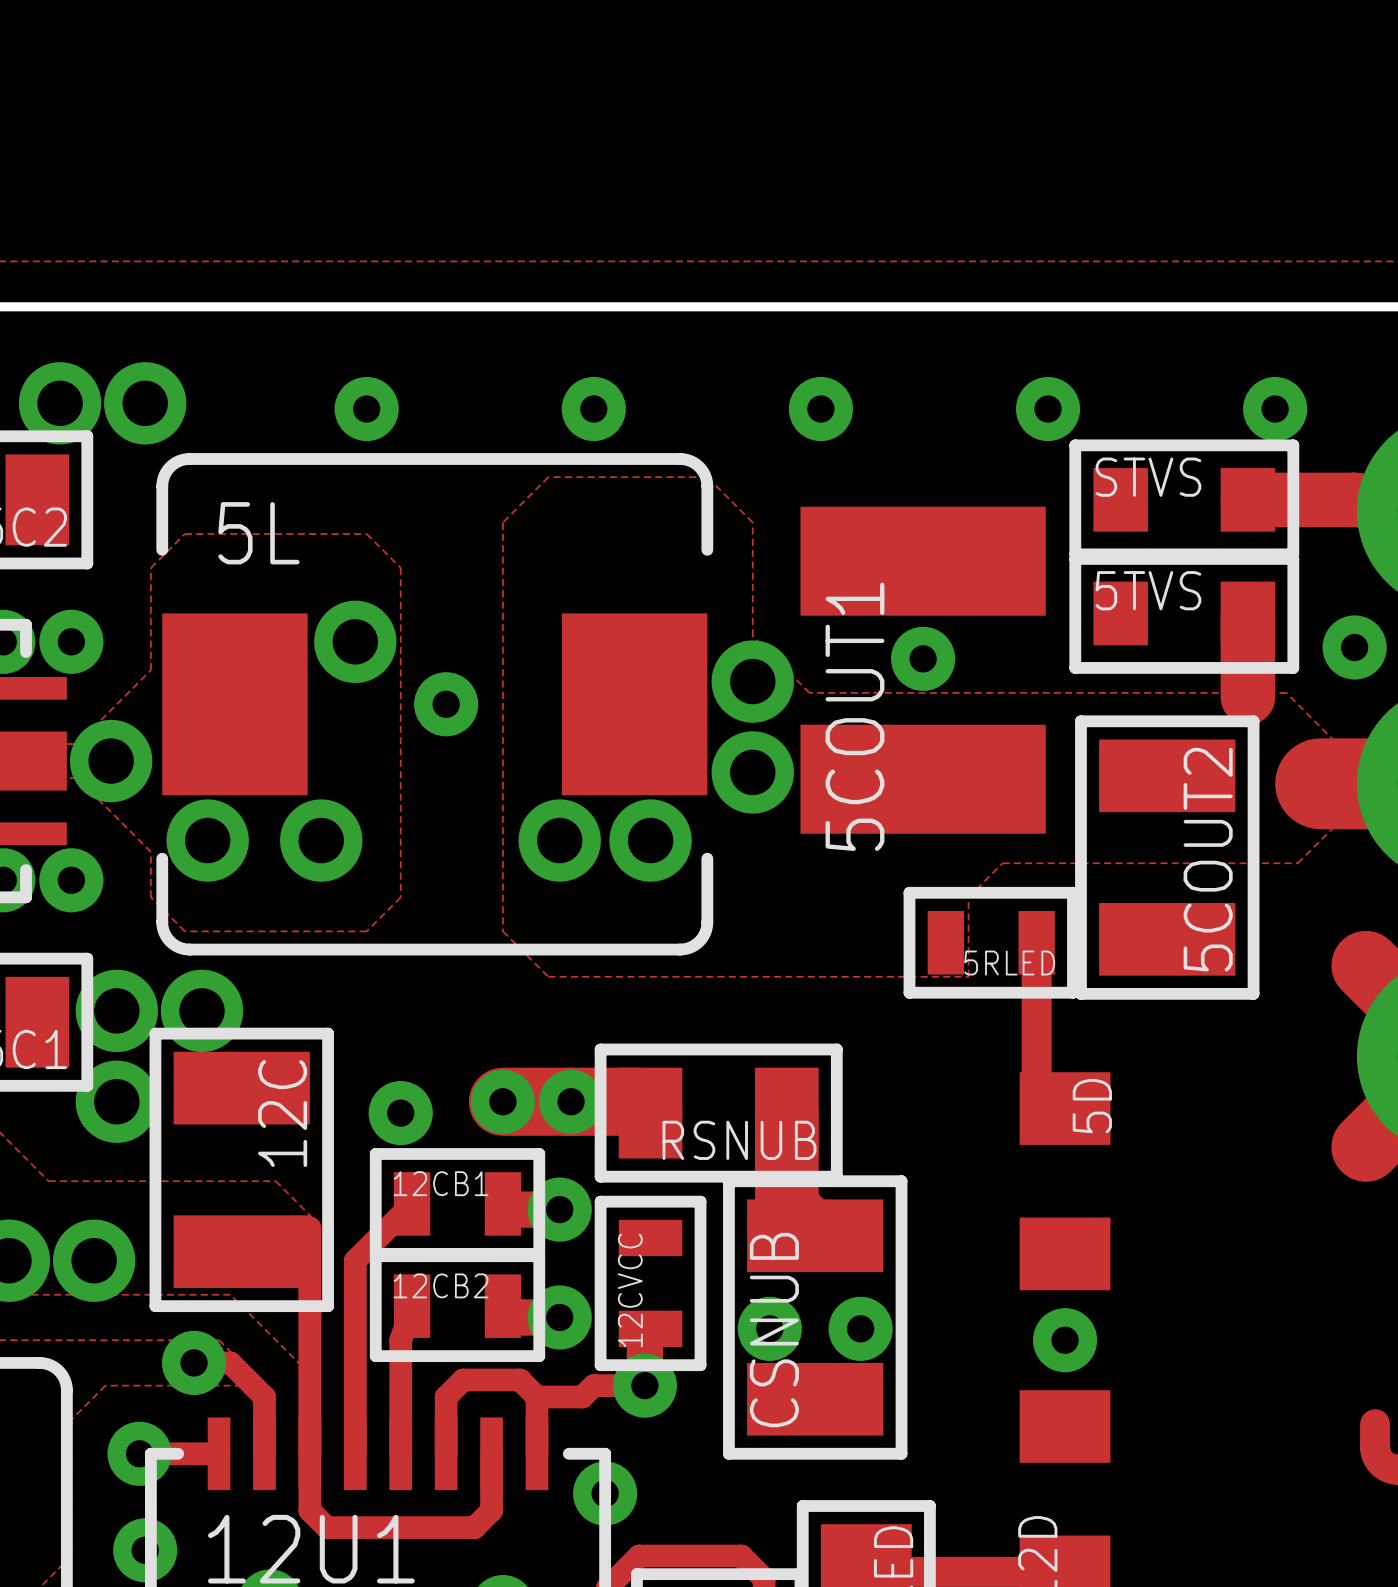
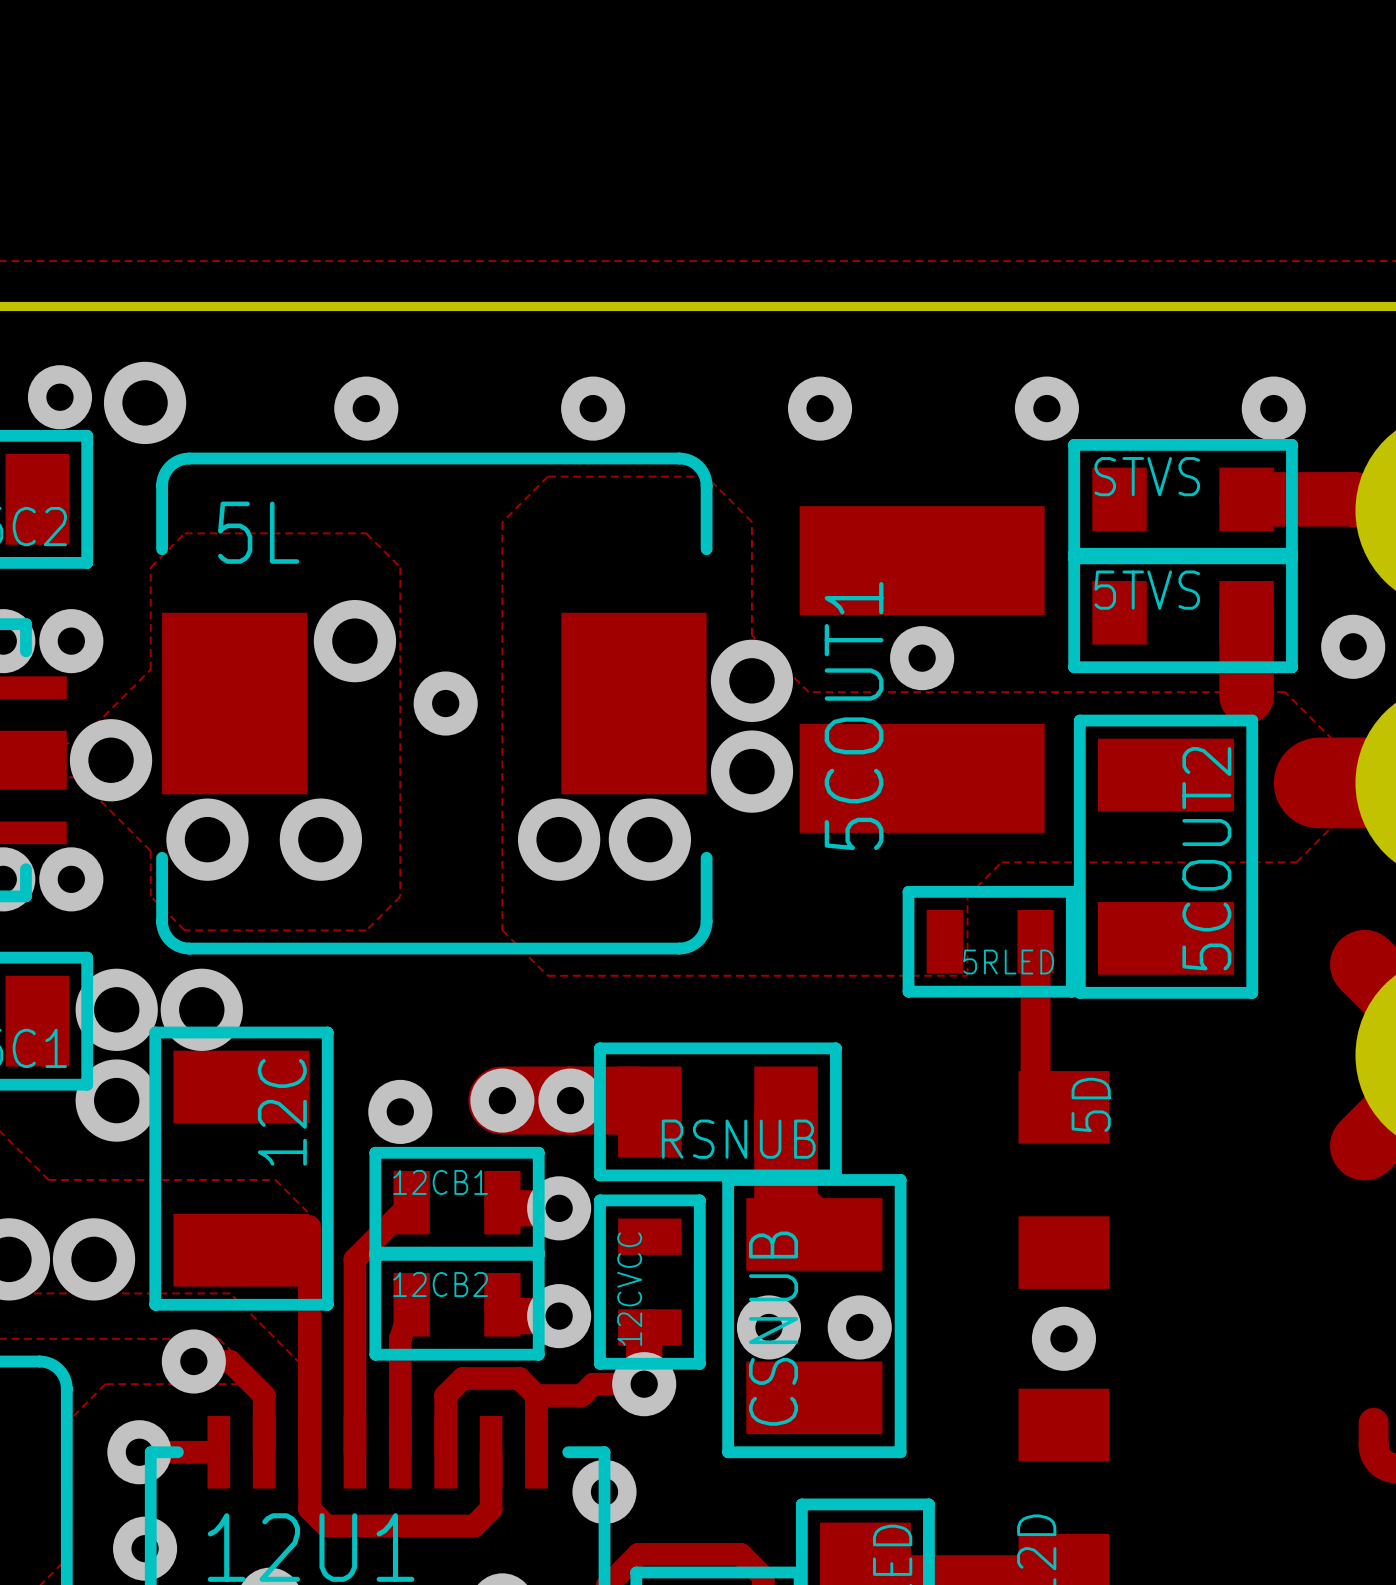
via size: [18, 362, 102, 445] -> [27, 365, 93, 430]

